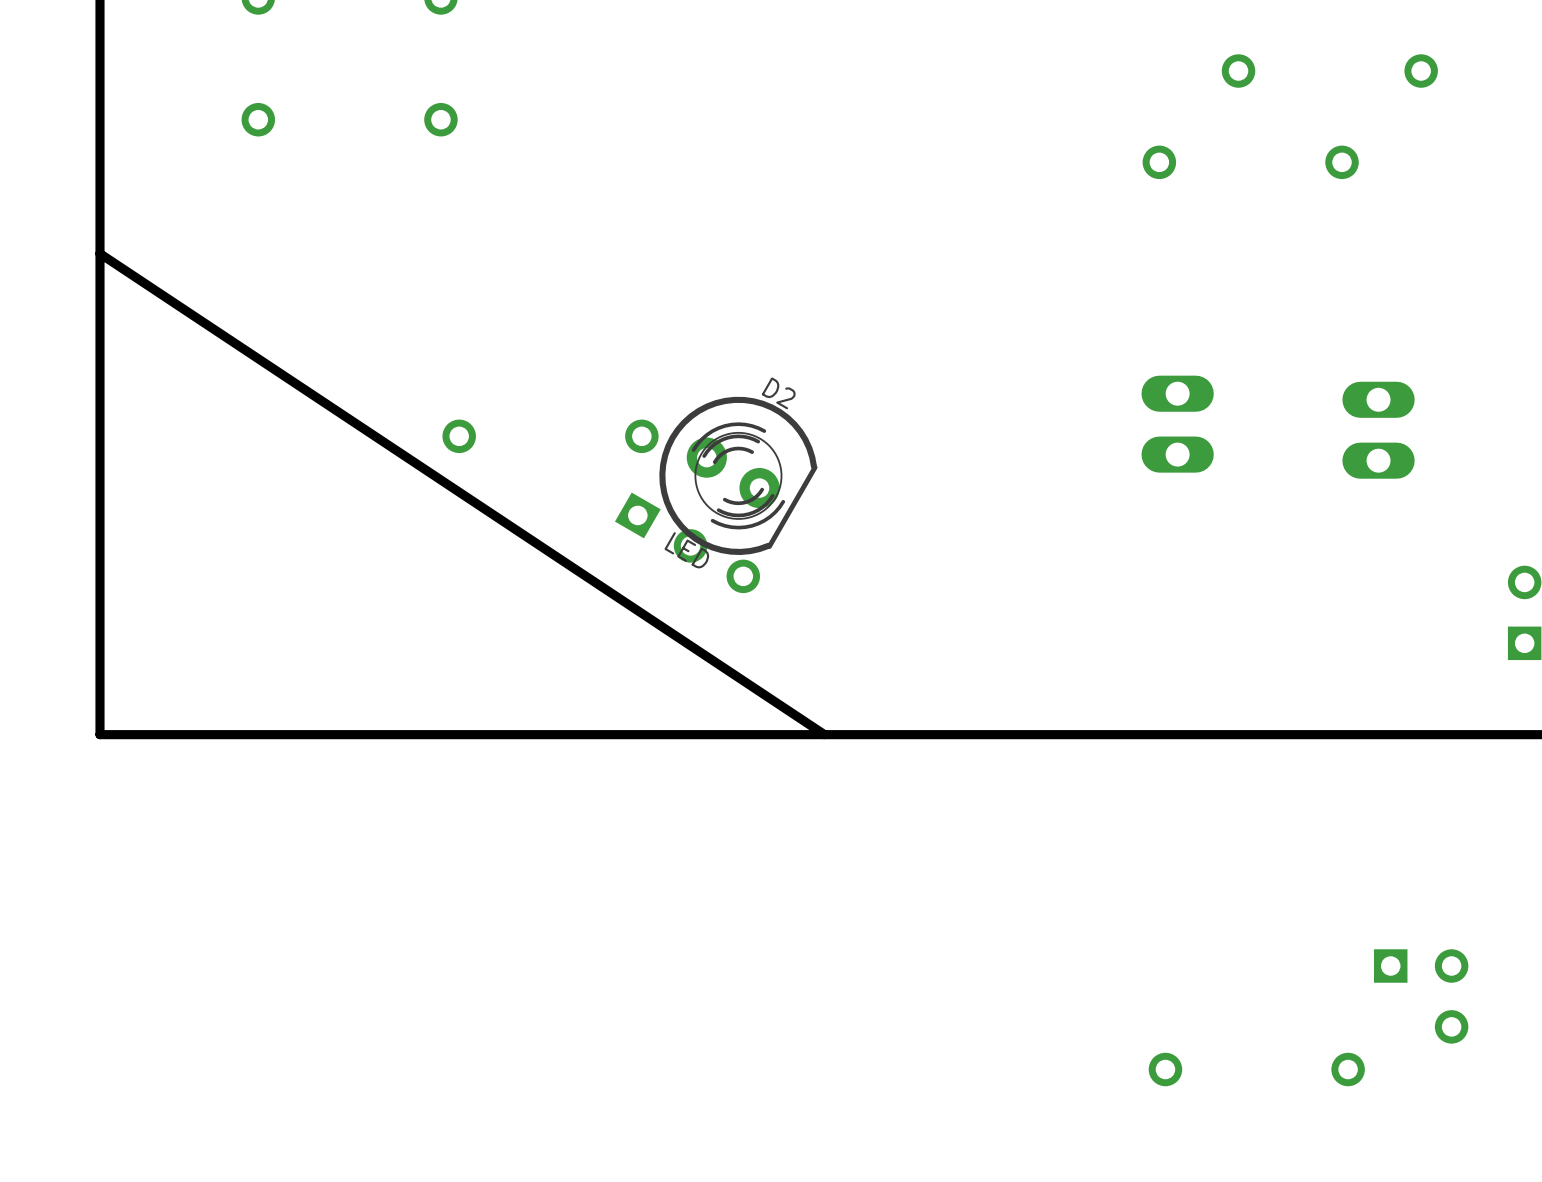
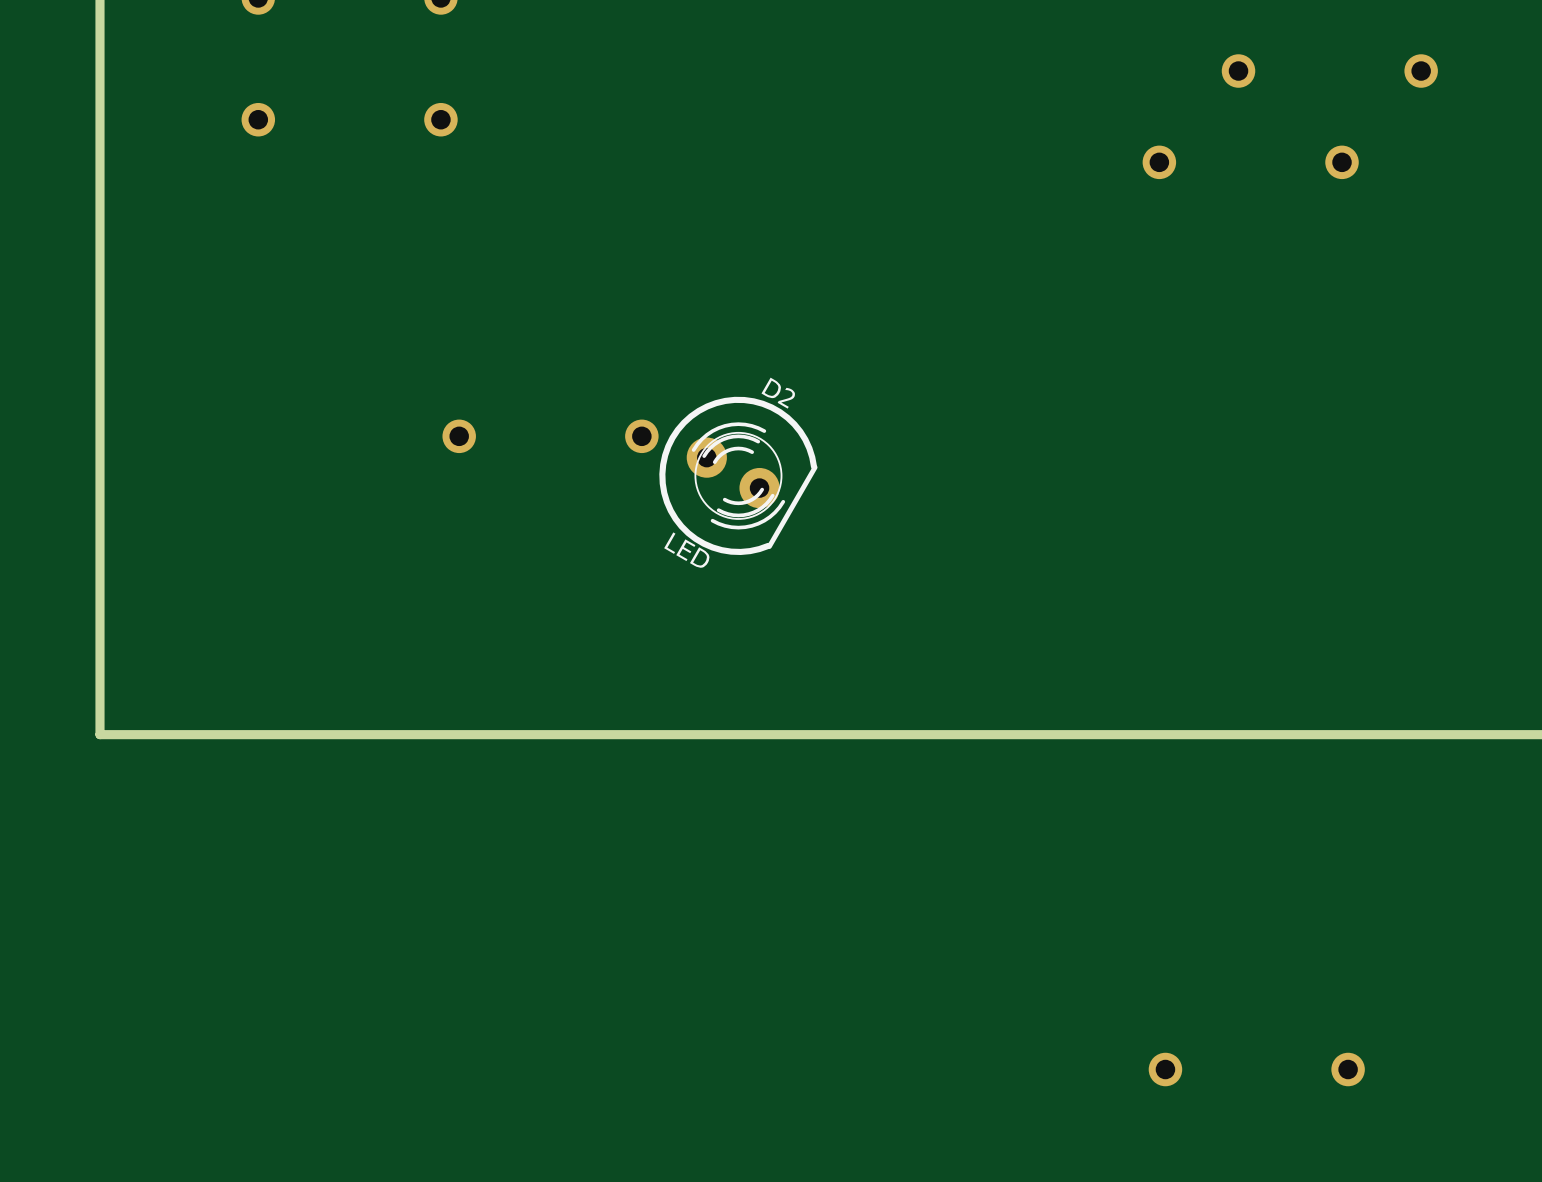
board edge: (99, 253) (824, 734) -> none
part: (1177, 424) -> none
part: (1378, 430) -> none
part: (687, 542) -> none
part: (1524, 612) -> none
part: (1421, 996) -> none

